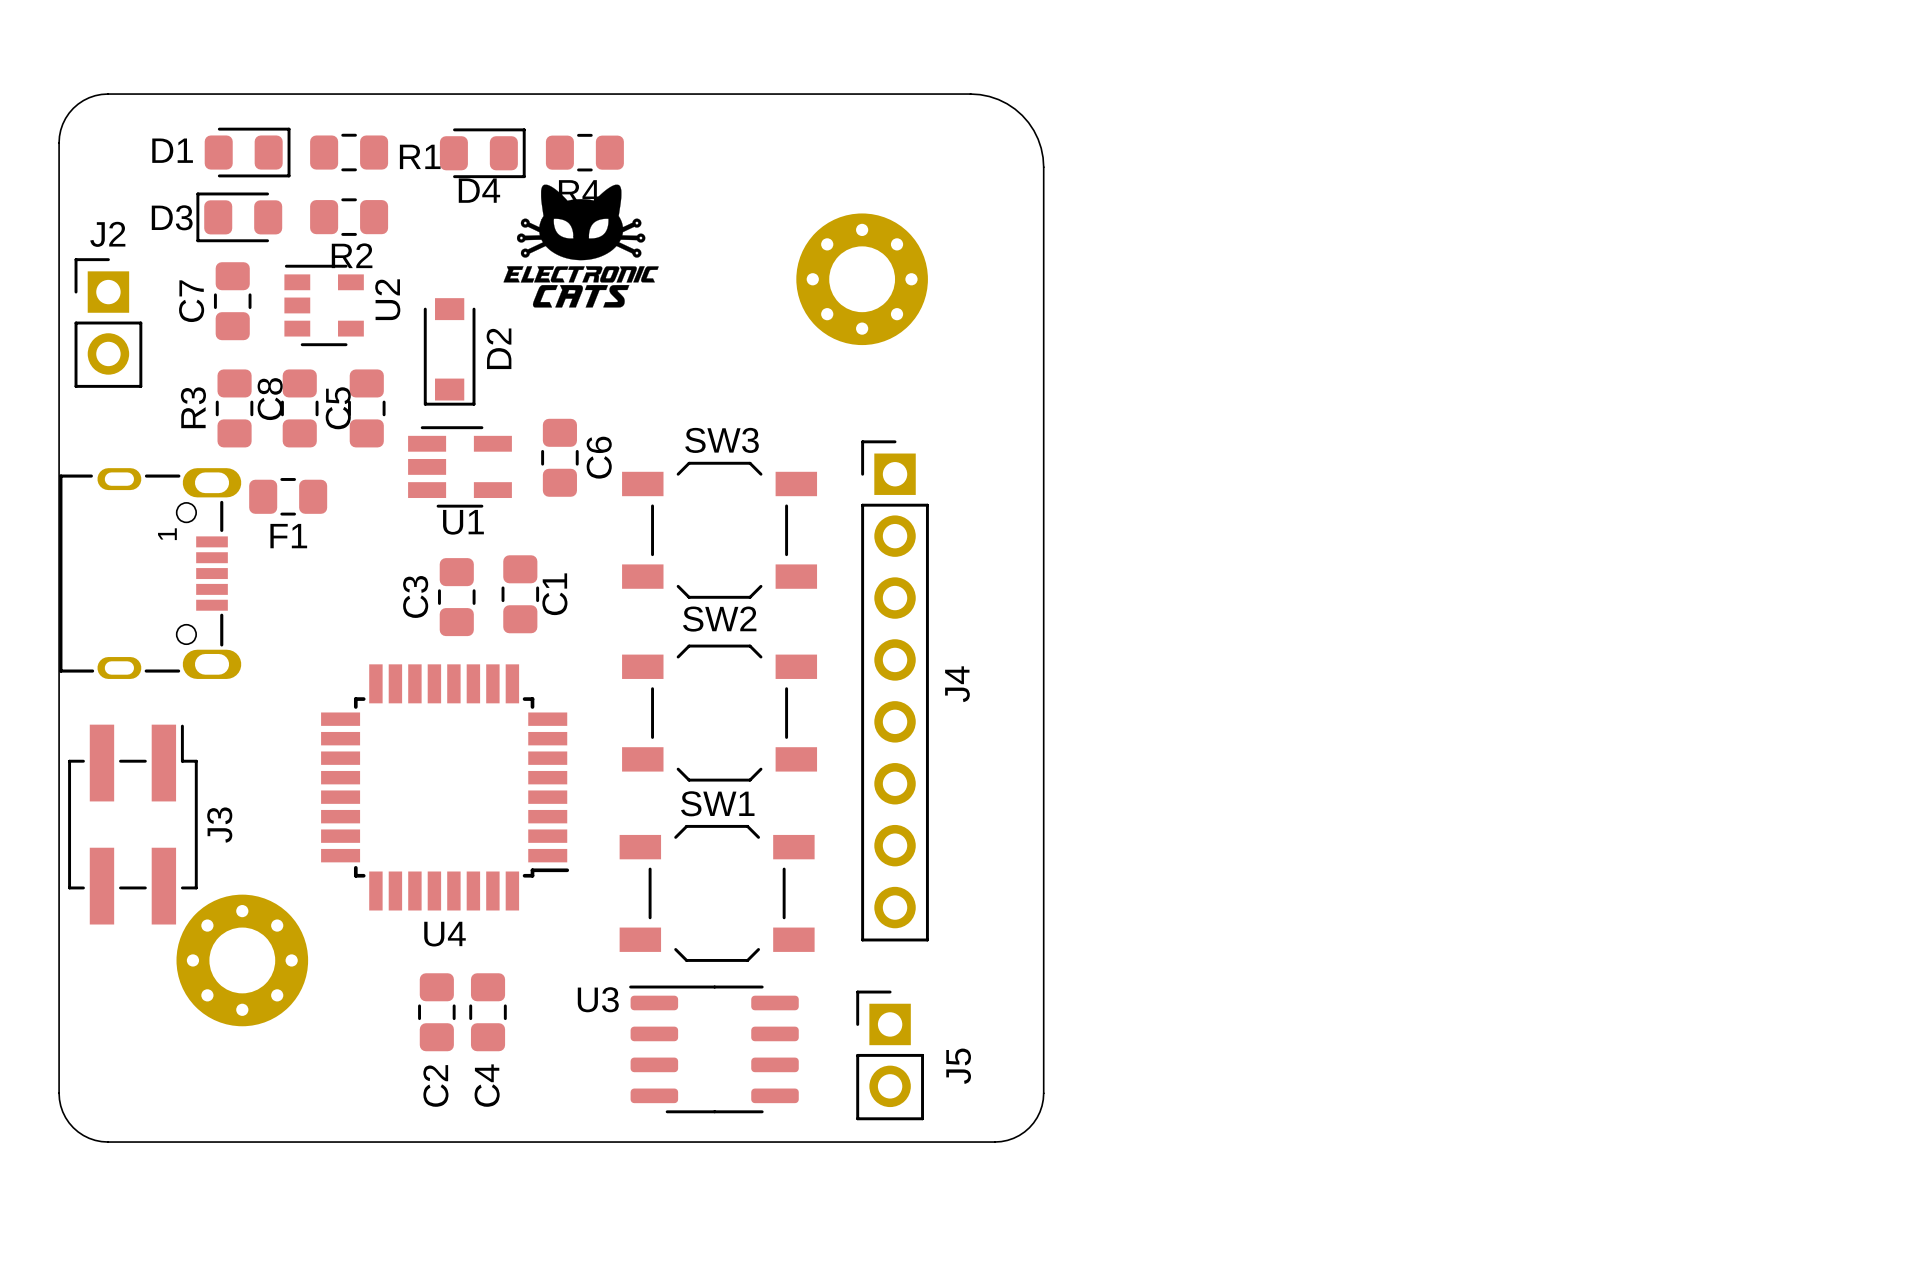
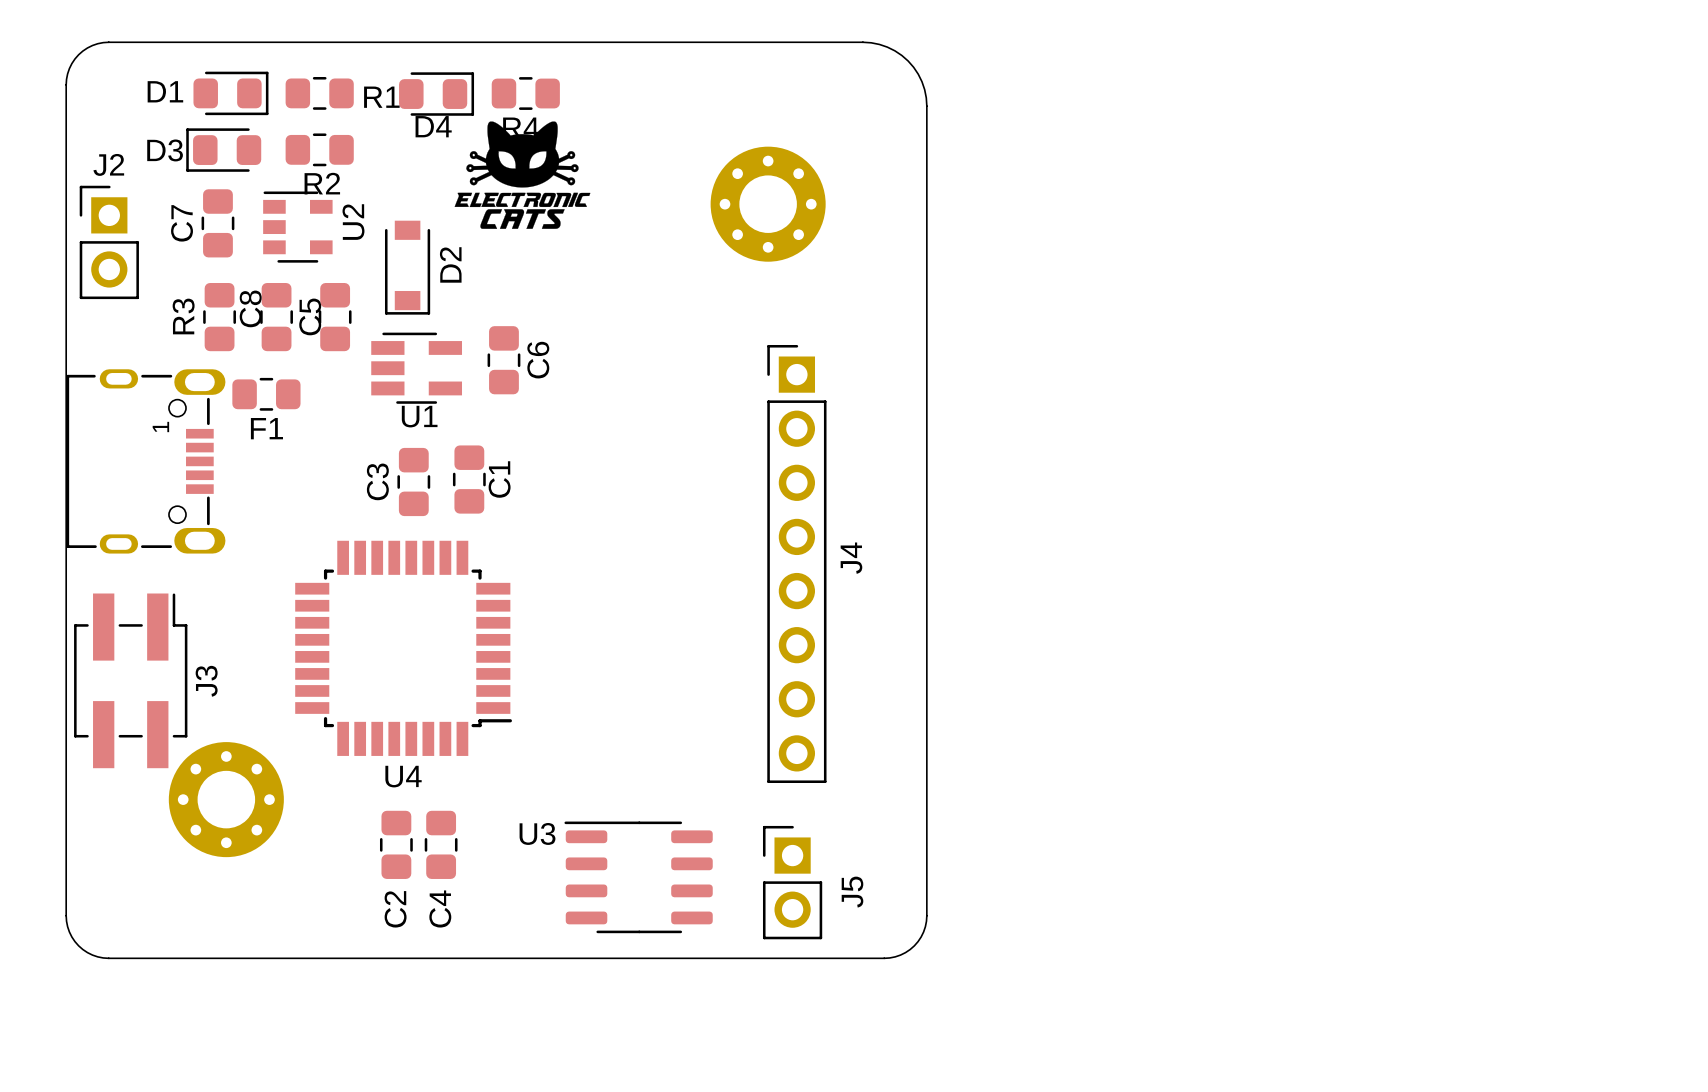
SW3: (719, 530) -> none
SW2: (719, 713) -> none
SW1: (717, 893) -> none

